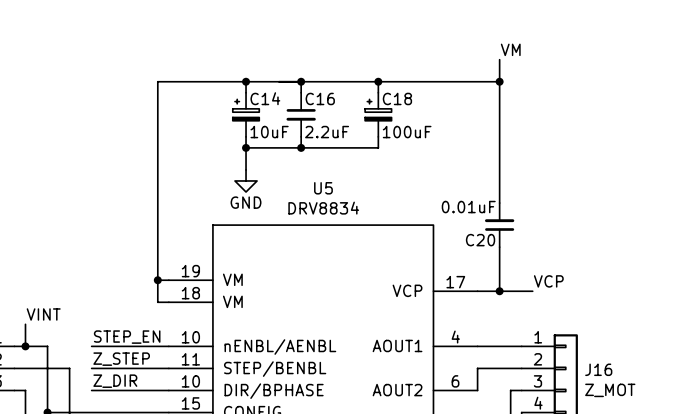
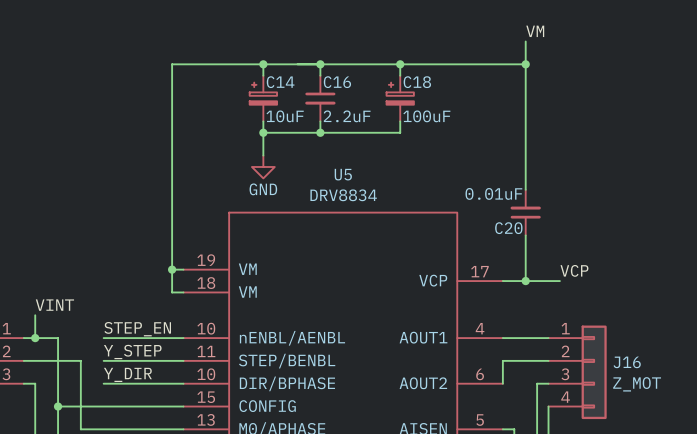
label: Z_STEP (121, 359) -> Y_STEP (132, 352)
label: Z_DIR (115, 381) -> Y_DIR (127, 374)

